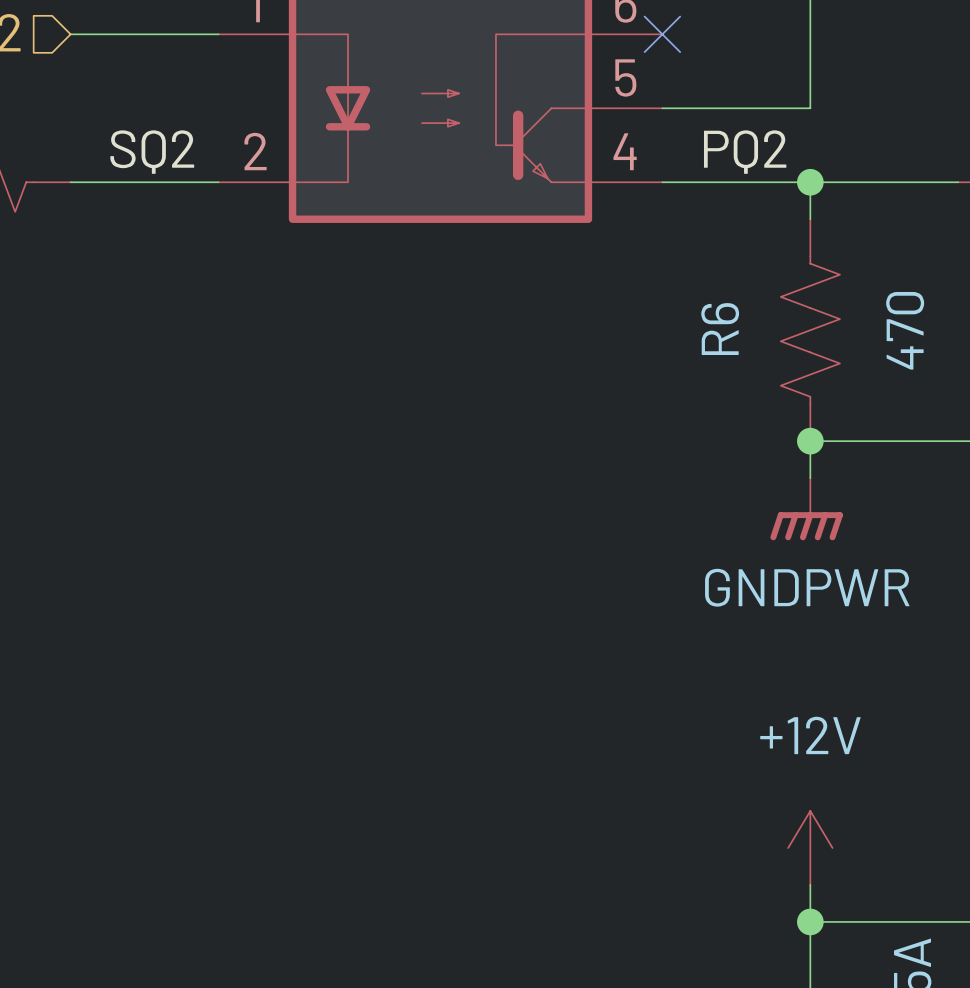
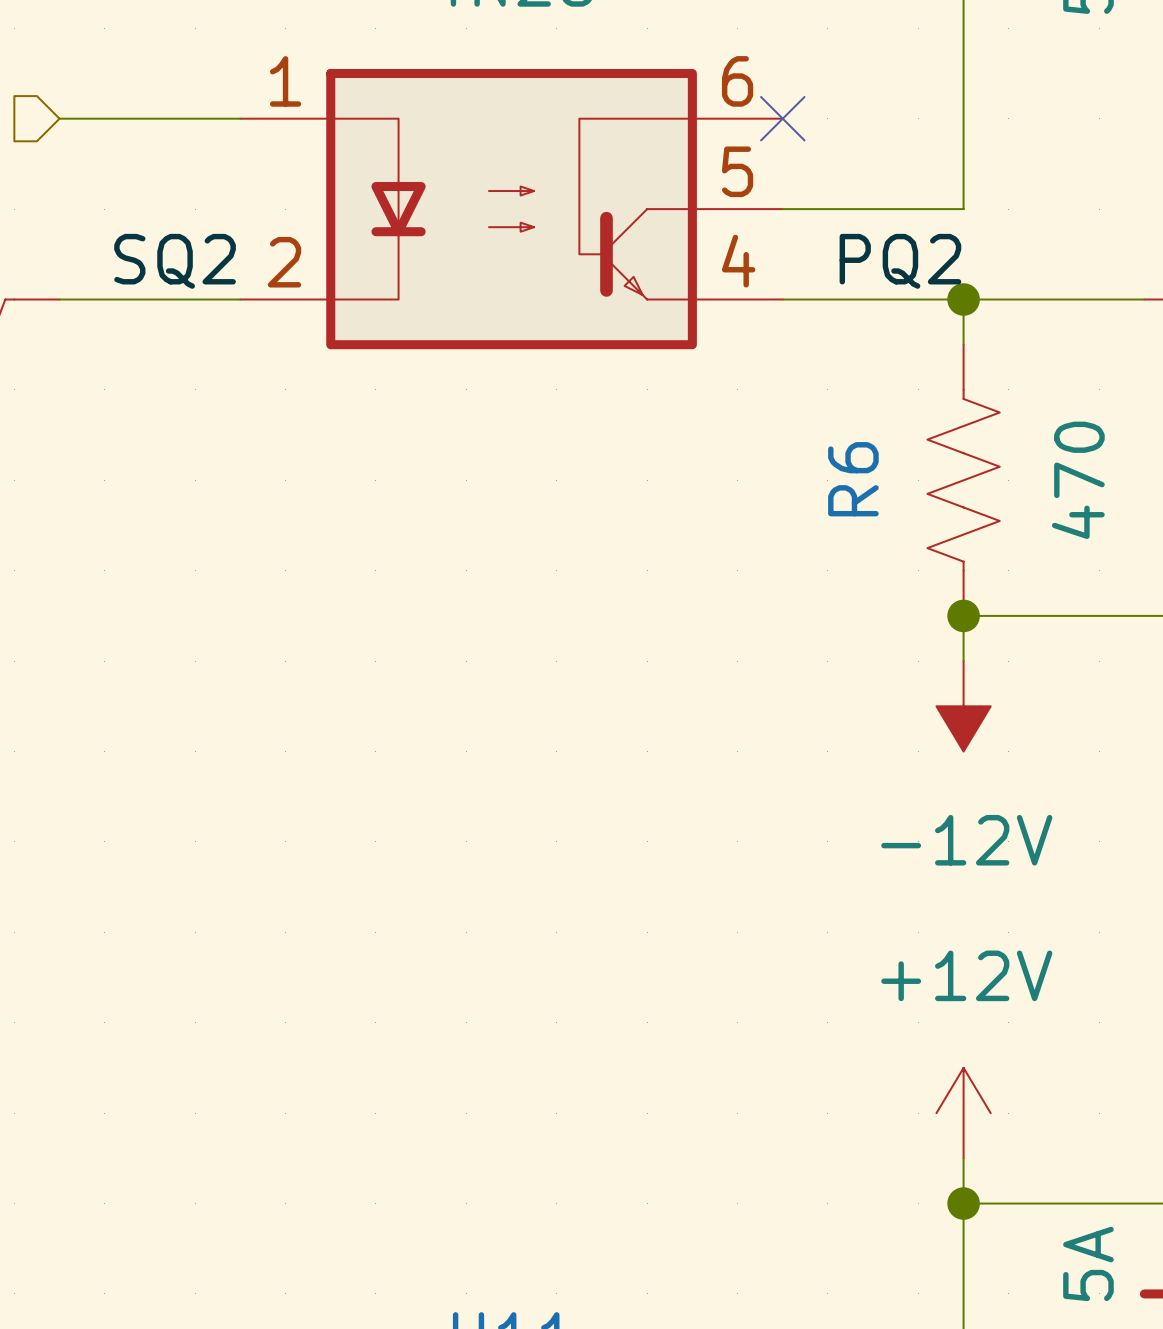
power symbol: GNDPWR (806, 509) -> -12V (963, 706)

